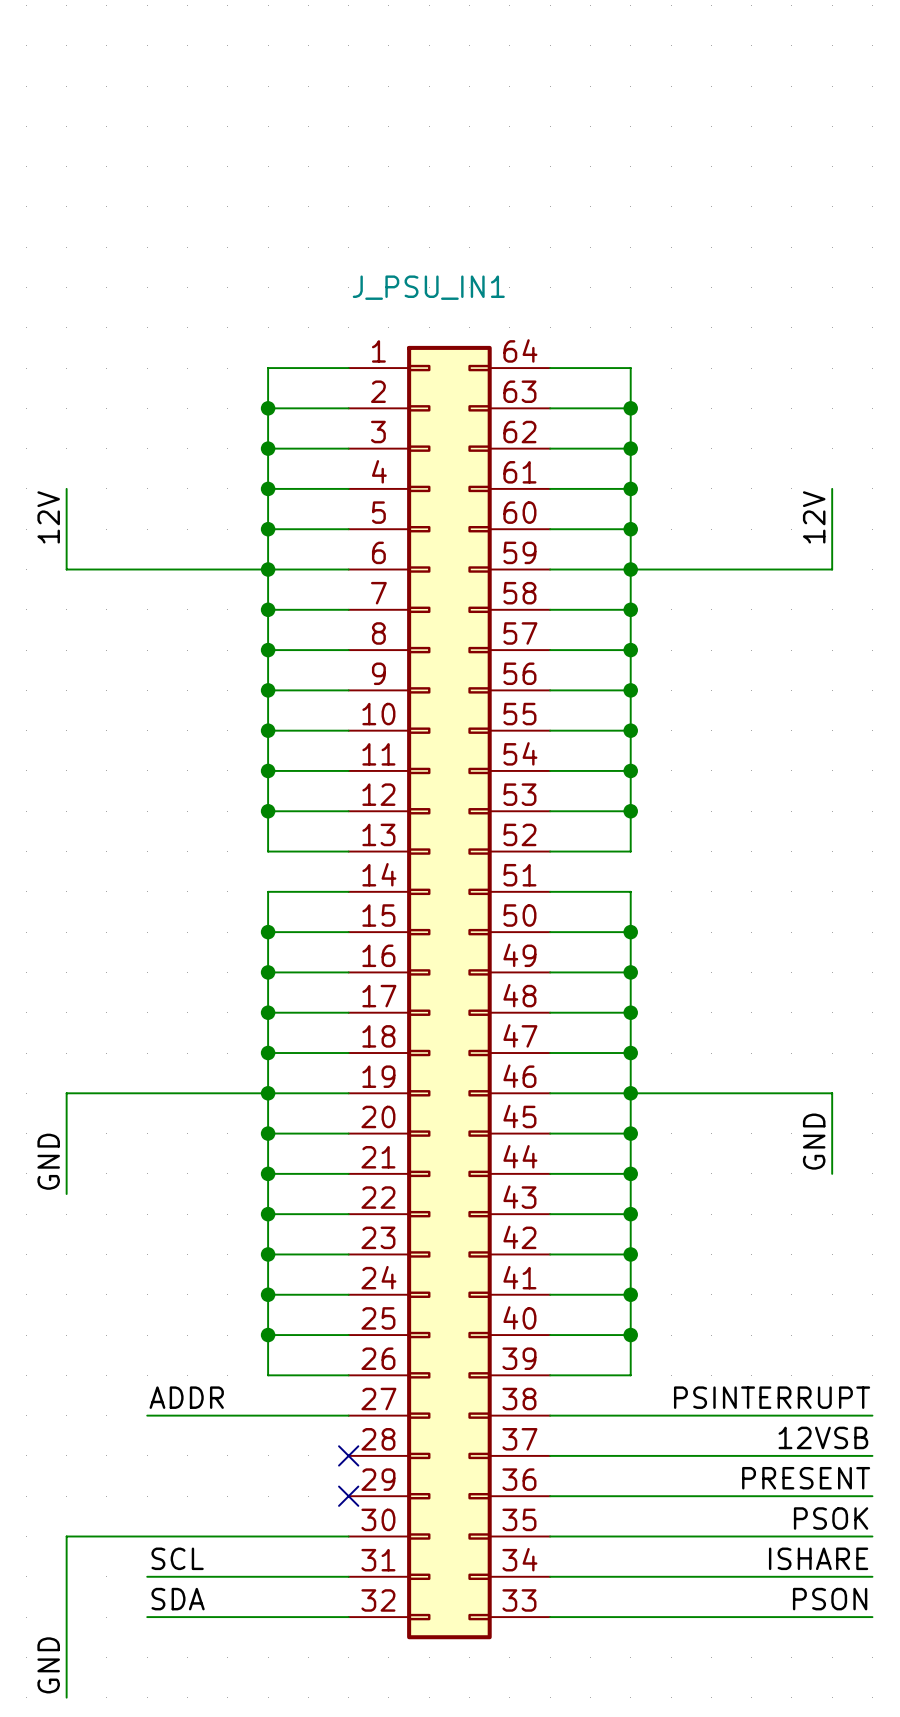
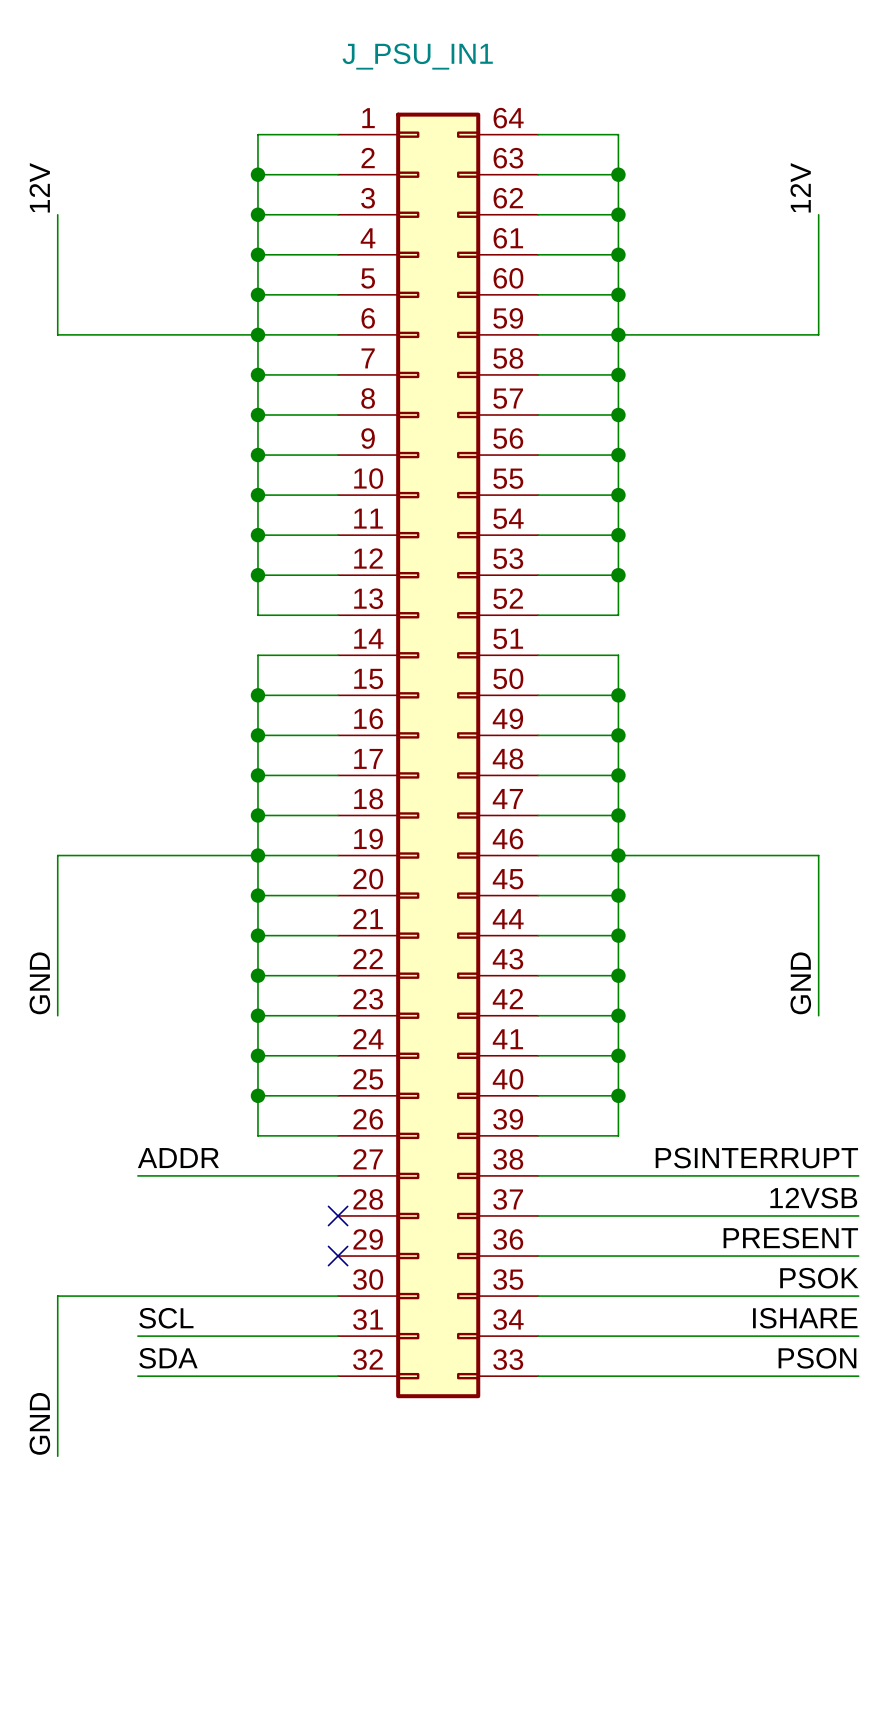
wire: none -> (338, 134) (257, 134) (257, 374)
wire: none -> (538, 134) (618, 134) (618, 374)
wire: none -> (257, 174) (338, 174)
junction: none -> (257, 174)
wire: none -> (538, 174) (618, 174)
junction: none -> (618, 174)
wire: none -> (57, 214) (57, 334) (338, 334)
wire: none -> (257, 214) (338, 214)
junction: none -> (257, 214)
wire: none -> (538, 214) (618, 214)
junction: none -> (618, 214)
wire: none -> (818, 214) (818, 334) (538, 334)
wire: none -> (257, 254) (338, 254)
junction: none -> (257, 254)
wire: none -> (538, 254) (618, 254)
junction: none -> (618, 254)
wire: none -> (257, 294) (338, 294)
junction: none -> (257, 294)
wire: none -> (538, 294) (618, 294)
junction: none -> (618, 294)
junction: none -> (257, 334)
junction: none -> (618, 334)
junction: none -> (257, 374)
junction: none -> (618, 374)
wire: (66, 488) (66, 569) (268, 569) -> none
wire: (832, 488) (832, 569) (630, 569) -> none
label position: 12V (48, 517) -> 12V (39, 187)
label position: 12V (814, 517) -> 12V (800, 187)
wire: (268, 609) (268, 650) -> none
junction: (268, 609) -> none
wire: (630, 609) (630, 650) -> none
junction: (630, 609) -> none
junction: (268, 650) -> none
junction: (630, 650) -> none
junction: none -> (257, 855)
junction: none -> (618, 855)
wire: none -> (257, 895) (257, 855) (57, 855) (57, 1015)
junction: none -> (257, 895)
wire: none -> (618, 895) (618, 855) (818, 855) (818, 1015)
junction: none -> (618, 895)
label: none -> GND (39, 983)
J_PSU_IN1 position: (449, 992) -> (438, 755)
wire: (268, 1093) (66, 1093) (66, 1194) -> none
wire: (630, 1093) (832, 1093) (832, 1173) -> none
wire: (268, 1133) (268, 1375) -> (137, 1376) (257, 1376)
junction: (268, 1133) -> none
wire: (630, 1133) (630, 1375) -> (858, 1376) (618, 1376)
junction: (630, 1133) -> none
label position: GND (814, 1141) -> GND (800, 983)
label: GND (48, 1161) -> none
wire: none -> (137, 1175) (257, 1175)
junction: (268, 1173) -> none
wire: none -> (618, 1175) (858, 1175)
junction: (630, 1173) -> none
wire: (268, 1214) (348, 1214) -> none
junction: (268, 1214) -> none
no-connect mark: none -> (338, 1215)
wire: none -> (618, 1215) (858, 1215)
junction: (630, 1214) -> none
wire: (268, 1254) (348, 1254) -> none
junction: (268, 1254) -> none
no-connect mark: none -> (338, 1256)
wire: none -> (618, 1256) (858, 1256)
junction: (630, 1254) -> none
wire: none -> (257, 1296) (57, 1296) (57, 1456)
junction: (268, 1294) -> none
wire: none -> (618, 1296) (858, 1296)
junction: (630, 1294) -> none
wire: none -> (137, 1336) (257, 1336)
junction: (268, 1335) -> none
wire: none -> (618, 1336) (858, 1336)
junction: (630, 1335) -> none
label position: ADDR (186, 1397) -> ADDR (178, 1158)
label position: PSINTERRUPT (772, 1397) -> PSINTERRUPT (756, 1158)
wire: (147, 1415) (348, 1415) -> none
wire: (550, 1415) (872, 1415) -> none
label: none -> GND (39, 1423)
label position: 12VSB (823, 1437) -> 12VSB (813, 1198)
no-connect mark: (348, 1455) -> none
wire: (550, 1455) (872, 1455) -> none
label position: PRESENT (806, 1478) -> PRESENT (790, 1238)
no-connect mark: (348, 1496) -> none
wire: (550, 1496) (872, 1496) -> none
label position: PSOK (831, 1518) -> PSOK (819, 1278)
wire: (348, 1536) (66, 1536) (66, 1697) -> none
wire: (550, 1536) (872, 1536) -> none
label position: SCL (177, 1558) -> SCL (166, 1318)
label position: ISHARE (818, 1558) -> ISHARE (805, 1318)
wire: (147, 1576) (348, 1576) -> none
wire: (550, 1576) (872, 1576) -> none
label position: SDA (178, 1599) -> SDA (168, 1358)
label position: PSON (830, 1599) -> PSON (817, 1358)
wire: (147, 1617) (348, 1617) -> none
wire: (550, 1617) (872, 1617) -> none
label: GND (48, 1665) -> none

